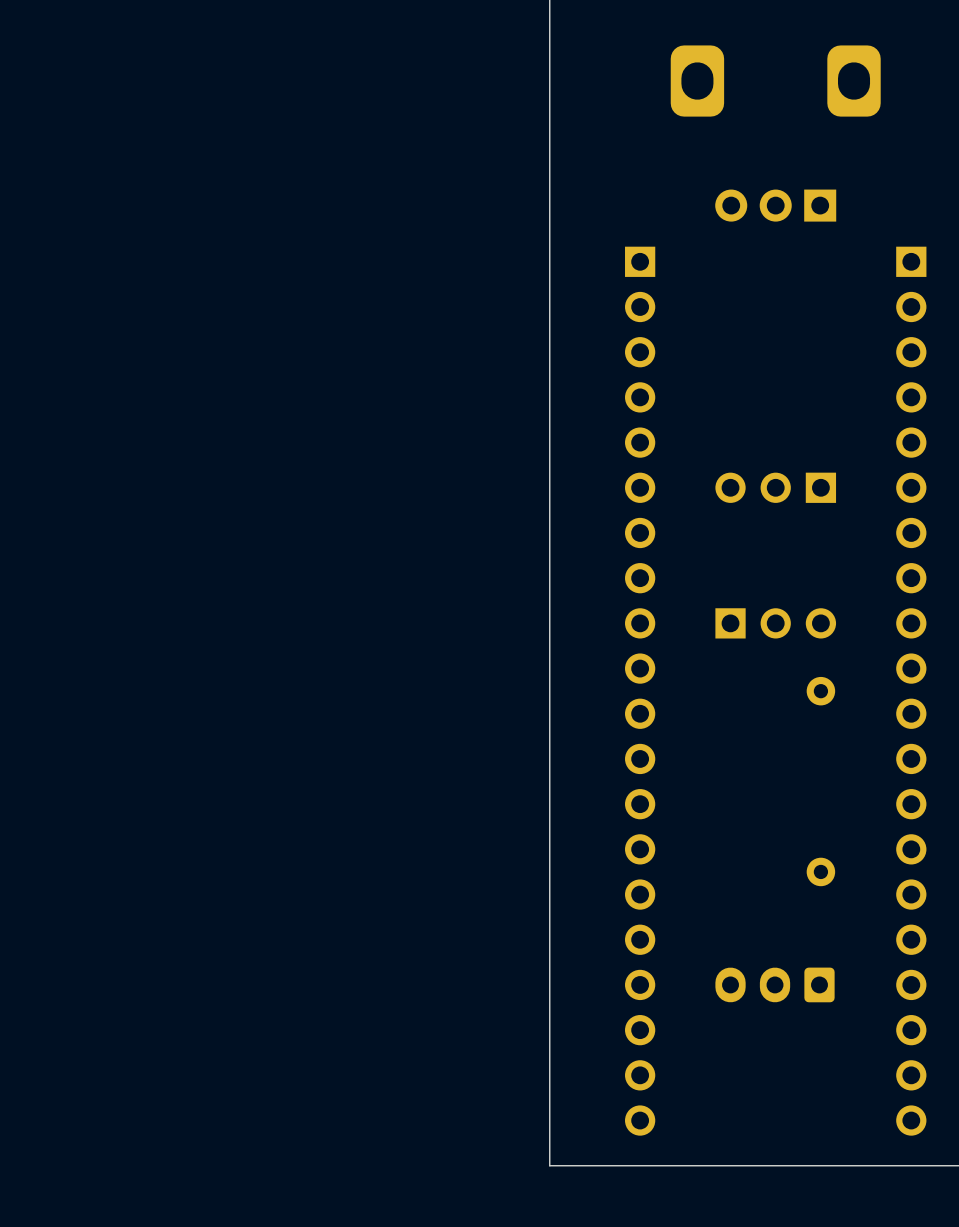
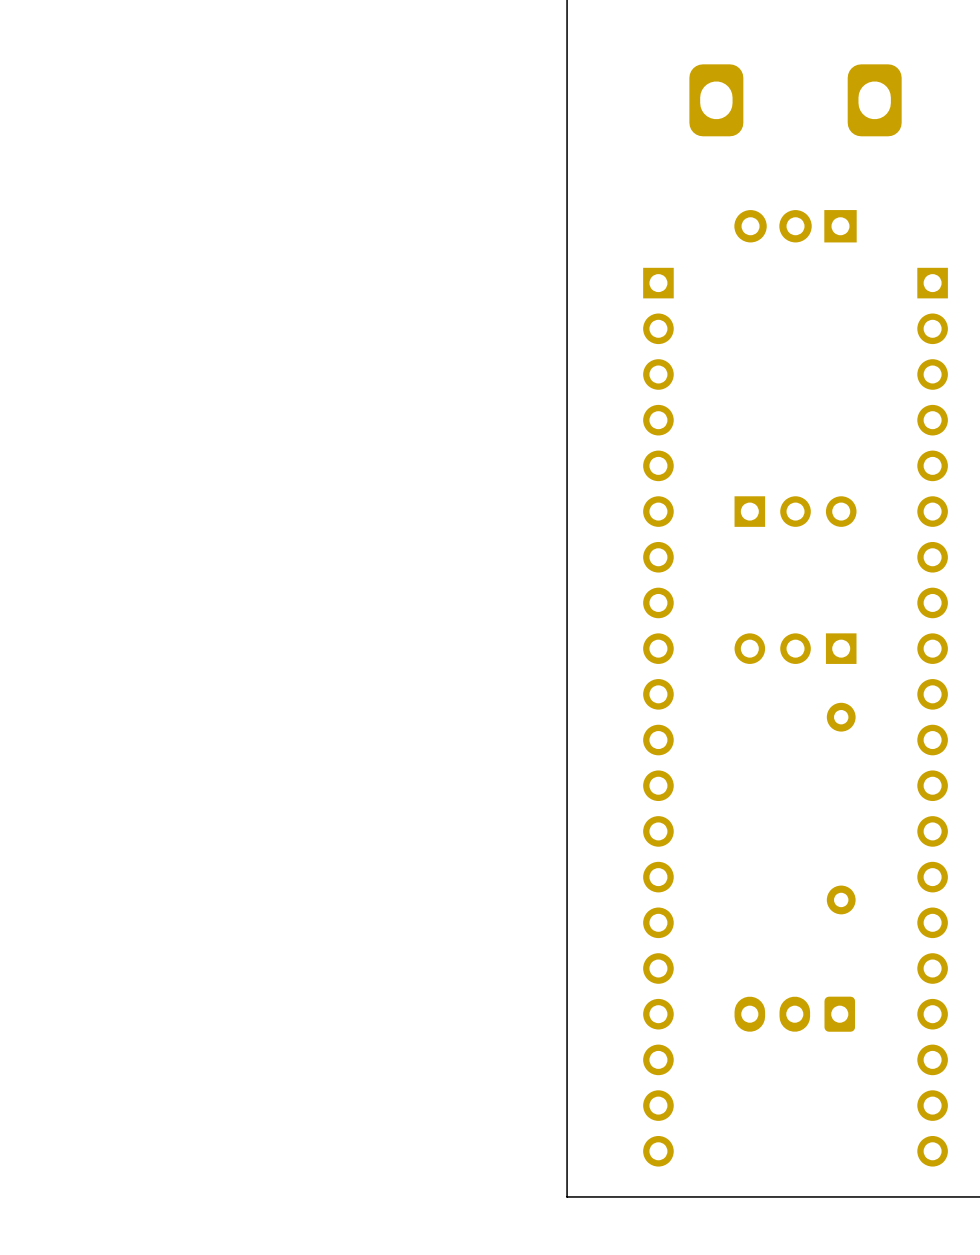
part rotation: 0° (775, 487) -> 180° (795, 511)
part rotation: 0° (775, 623) -> 180° (795, 648)

